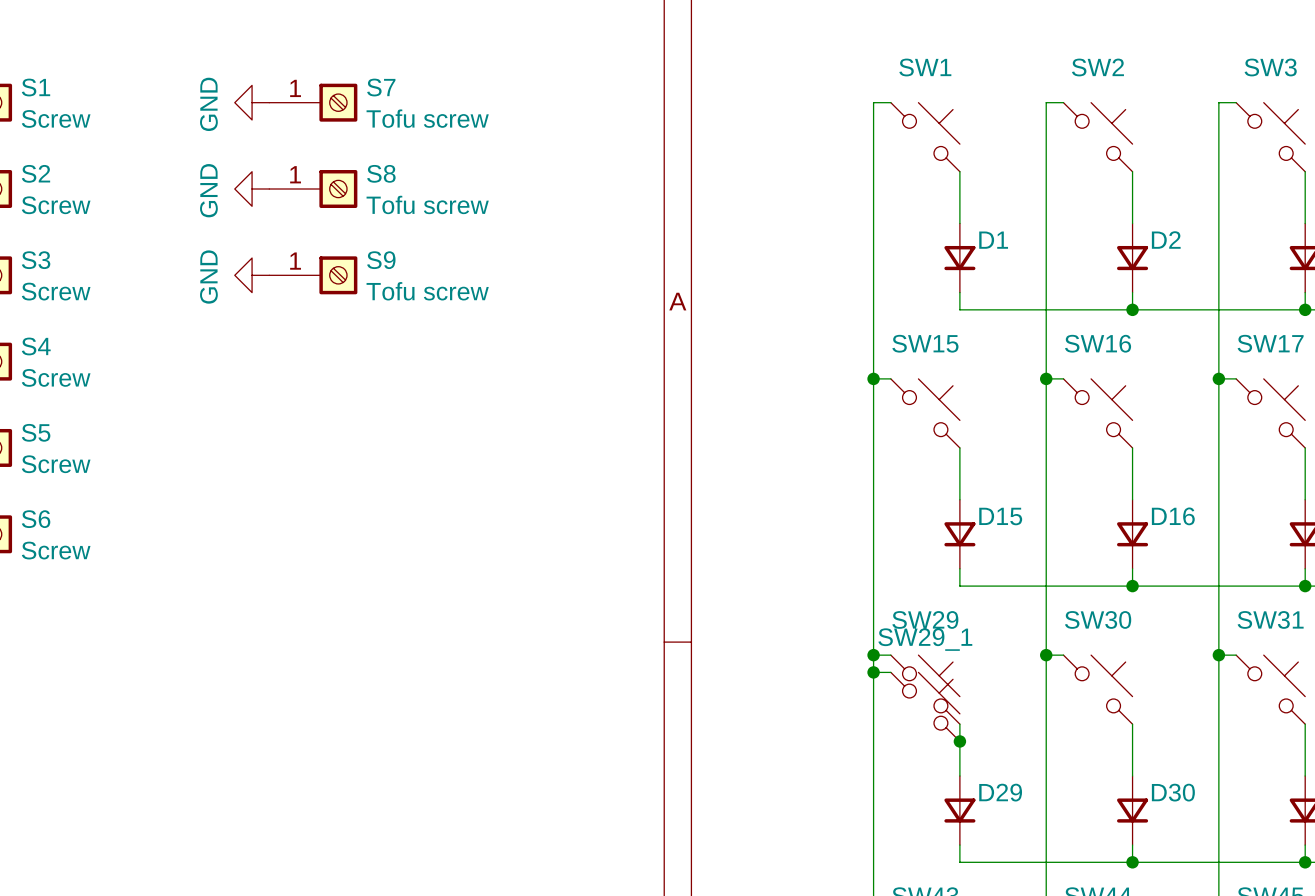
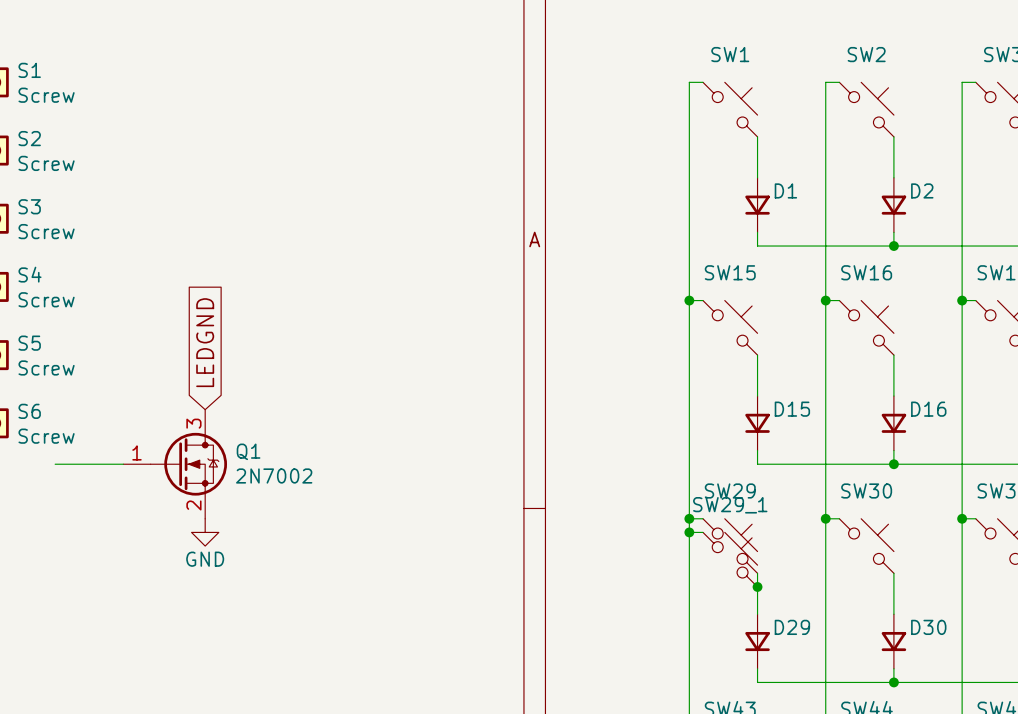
power symbol: GND (252, 102) -> none
S7: Tofu screw (313, 102) -> none
power symbol: GND (252, 189) -> none
S8: Tofu screw (313, 189) -> none
power symbol: GND (252, 275) -> none
S9: Tofu screw (313, 275) -> none
global label: none -> LEDGND (205, 342)
wire: none -> (55, 464) (123, 464)
Q1: none -> 2N7002 (175, 464)
power symbol: none -> GND (205, 532)

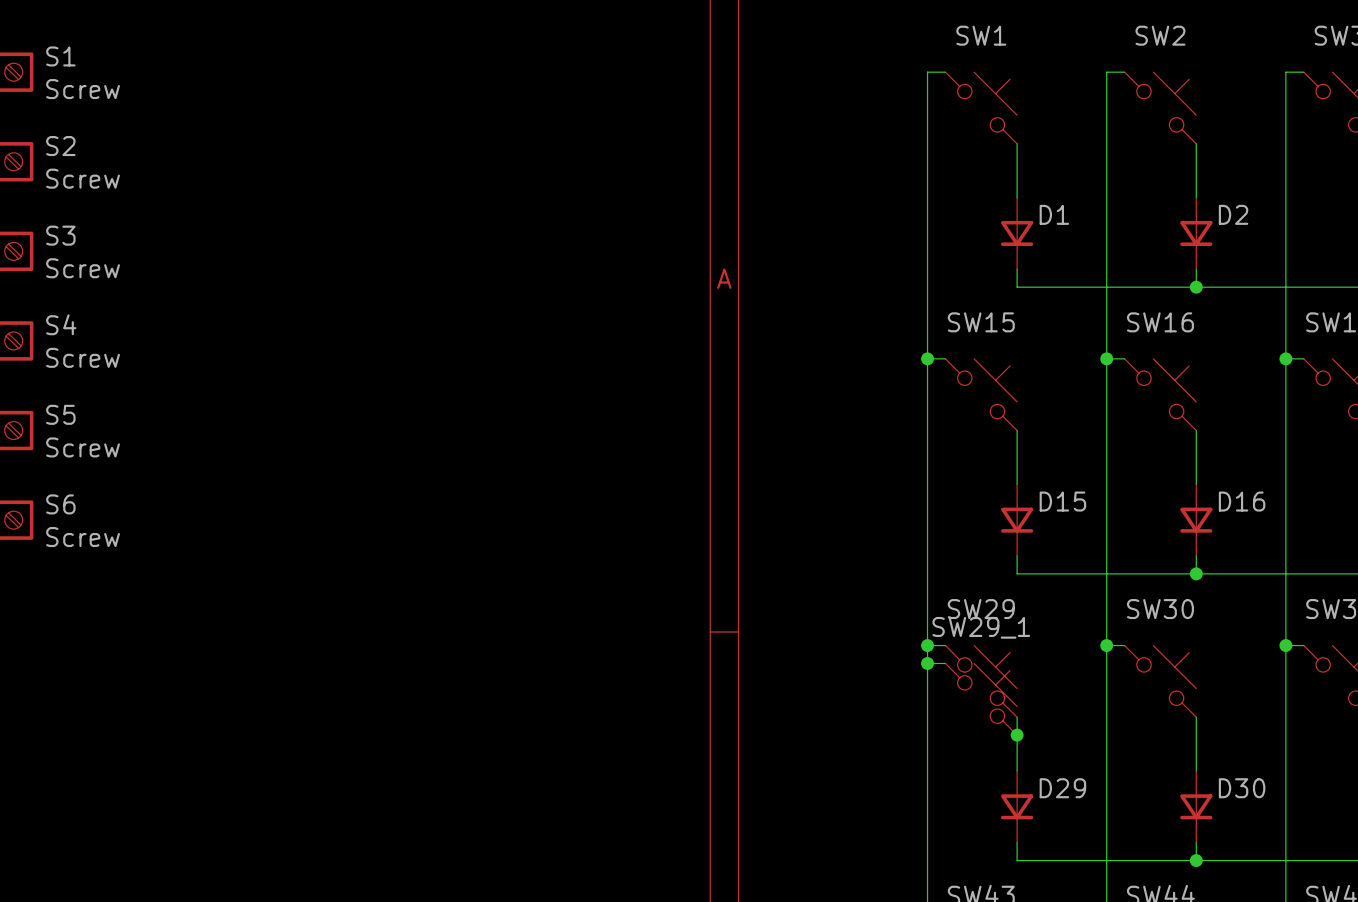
global label: LEDGND (205, 342) -> none
wire: (55, 464) (123, 464) -> none
Q1: 2N7002 (175, 464) -> none
power symbol: GND (205, 532) -> none

